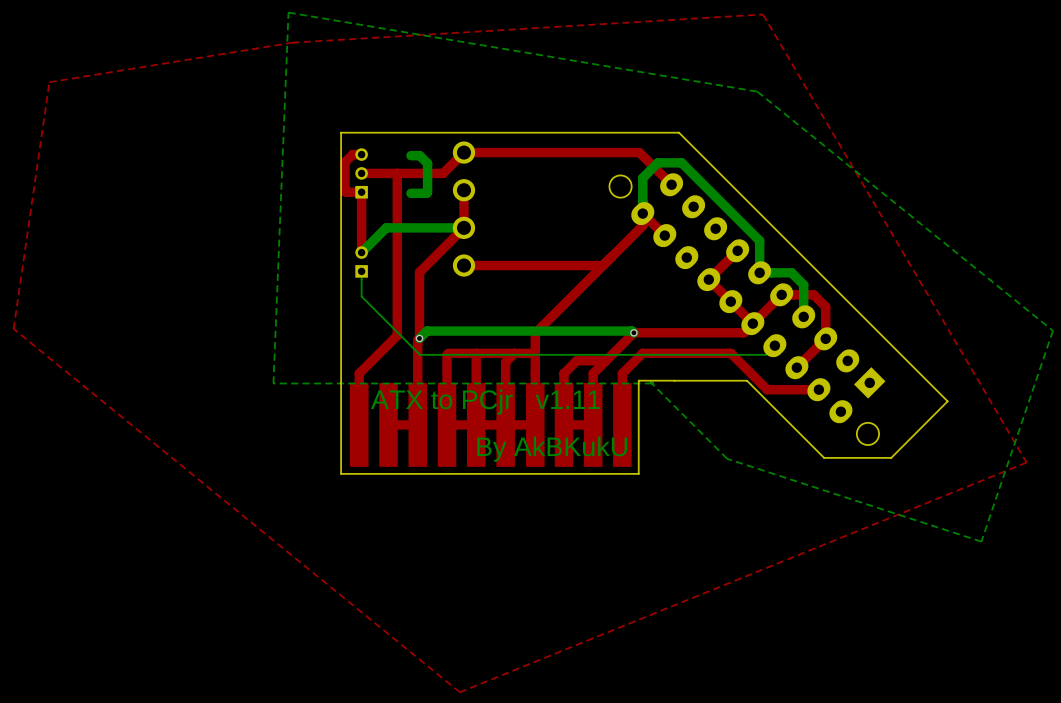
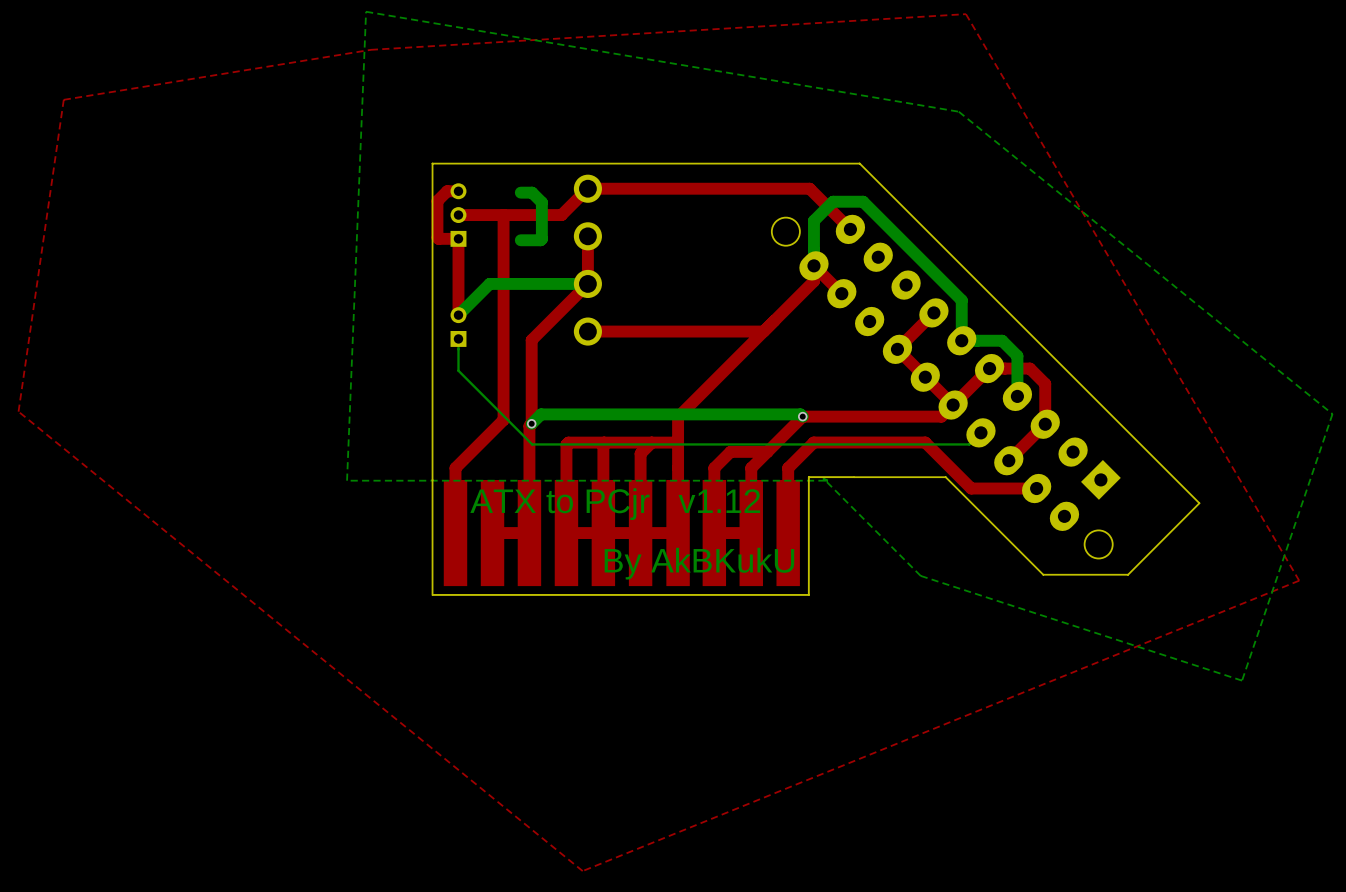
text: ATX to PCjr v1.11 (485, 402) -> ATX to PCjr v1.12 (615, 504)

